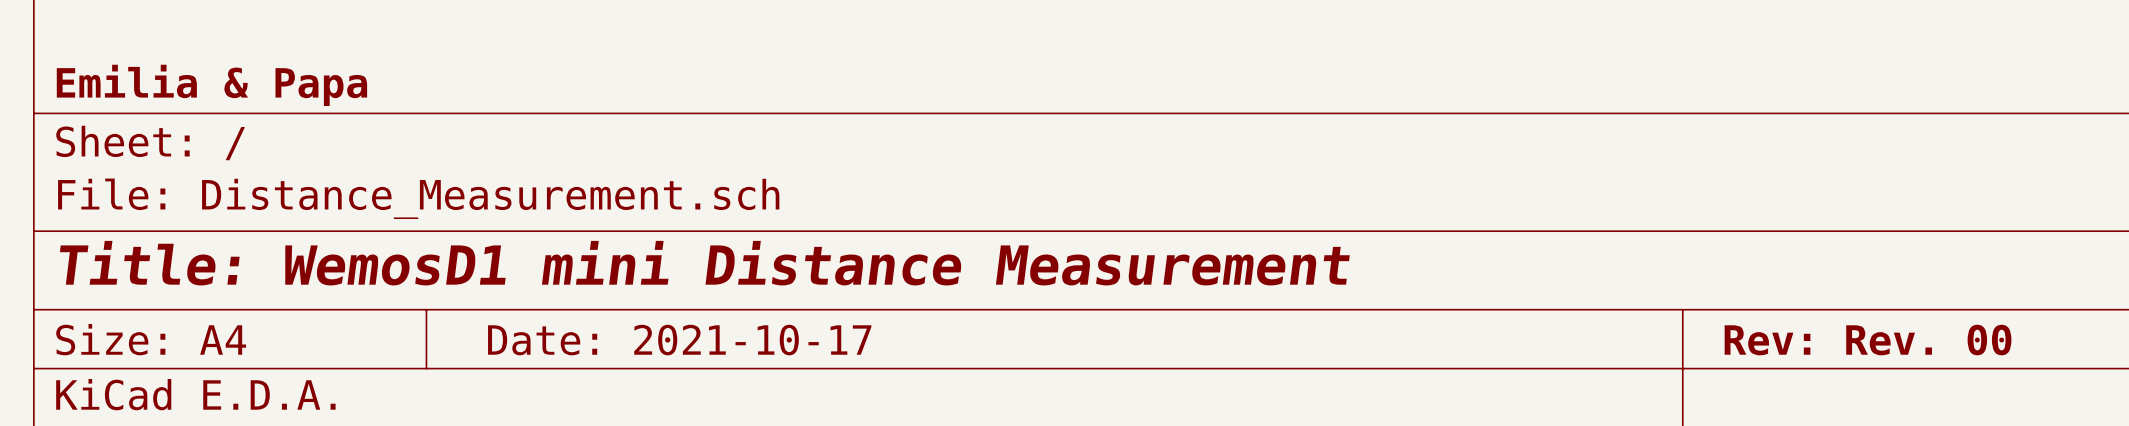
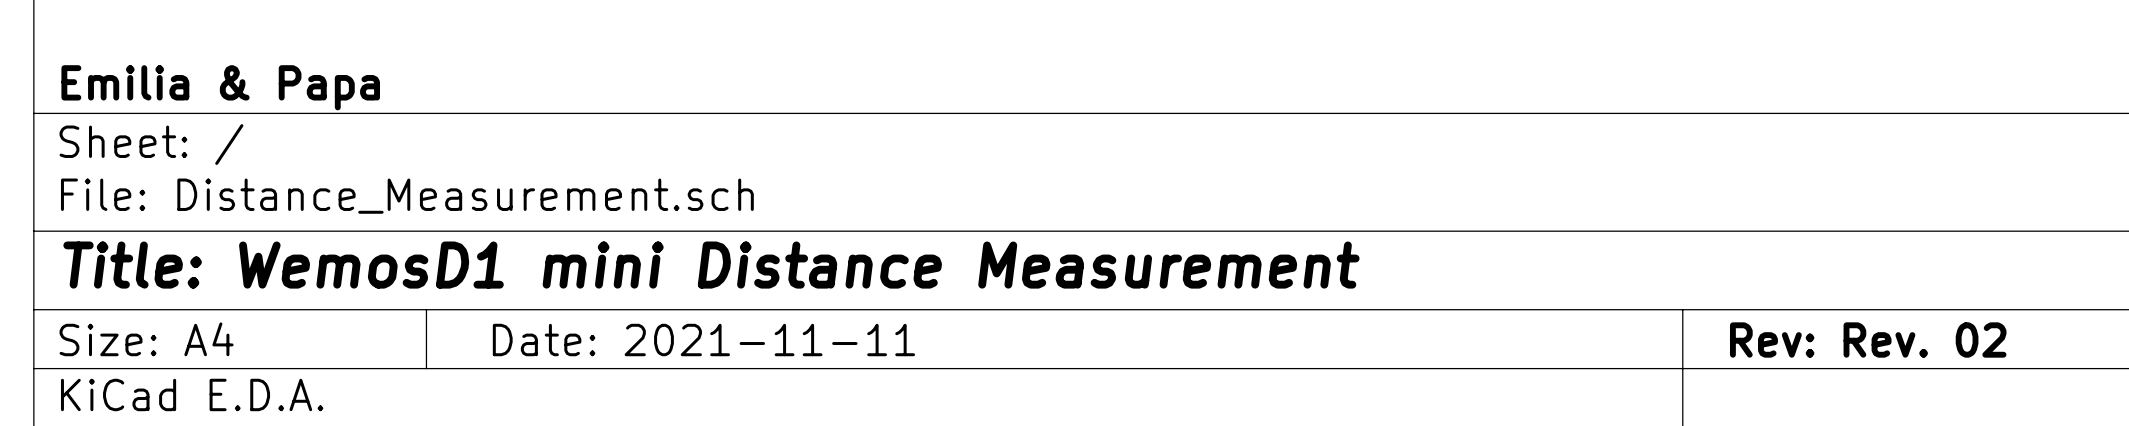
title block: Date: 2021-10-17 (679, 340) -> Date: 2021-11-11 (703, 340)
title block: Rev: Rev. 00 (1868, 340) -> Rev: Rev. 02 (1868, 340)

